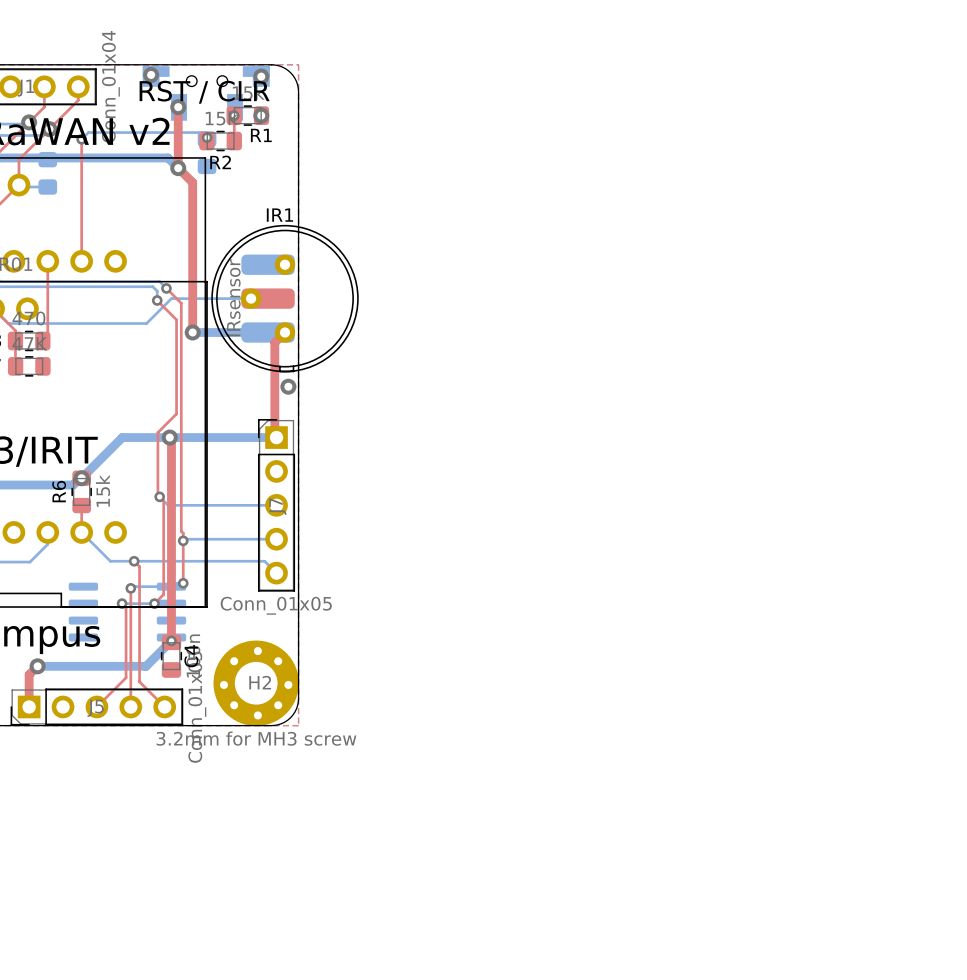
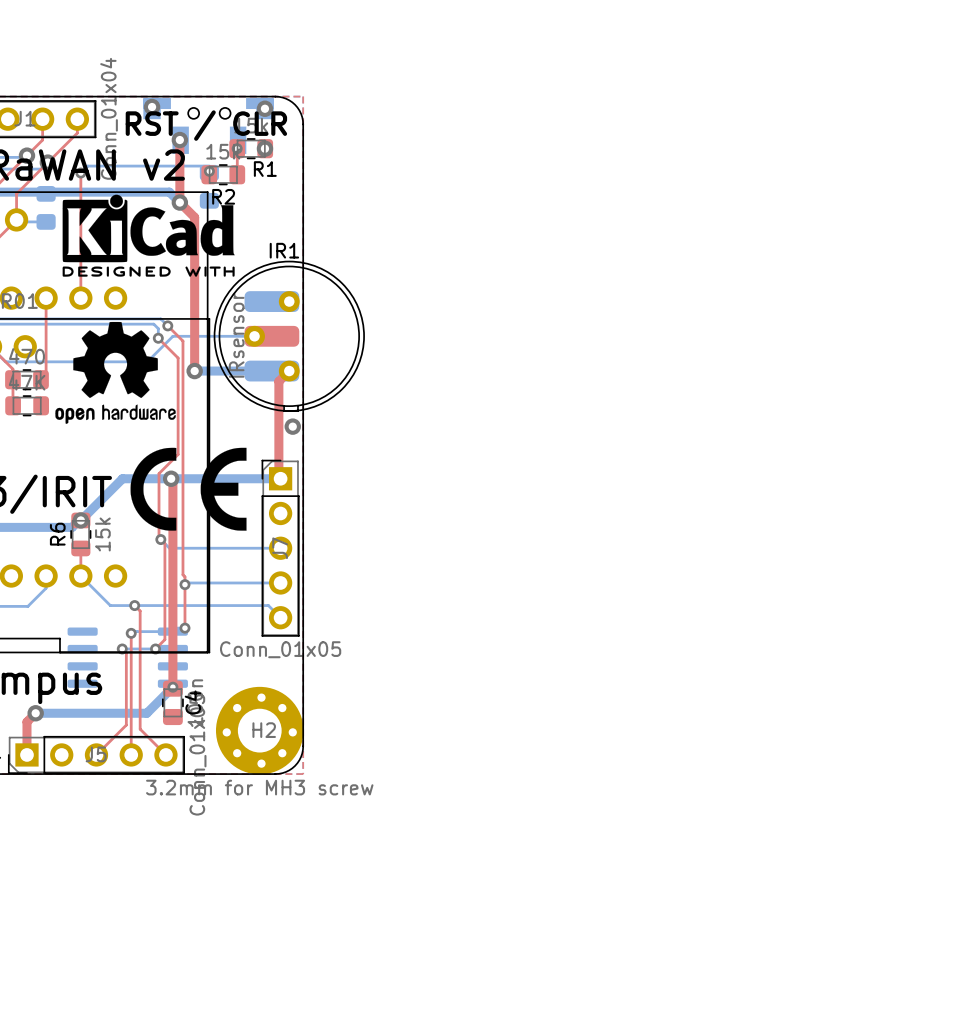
drawing: none -> [62, 194, 235, 277]
drawing: none -> [55, 321, 176, 424]
drawing: none -> [130, 447, 247, 531]

